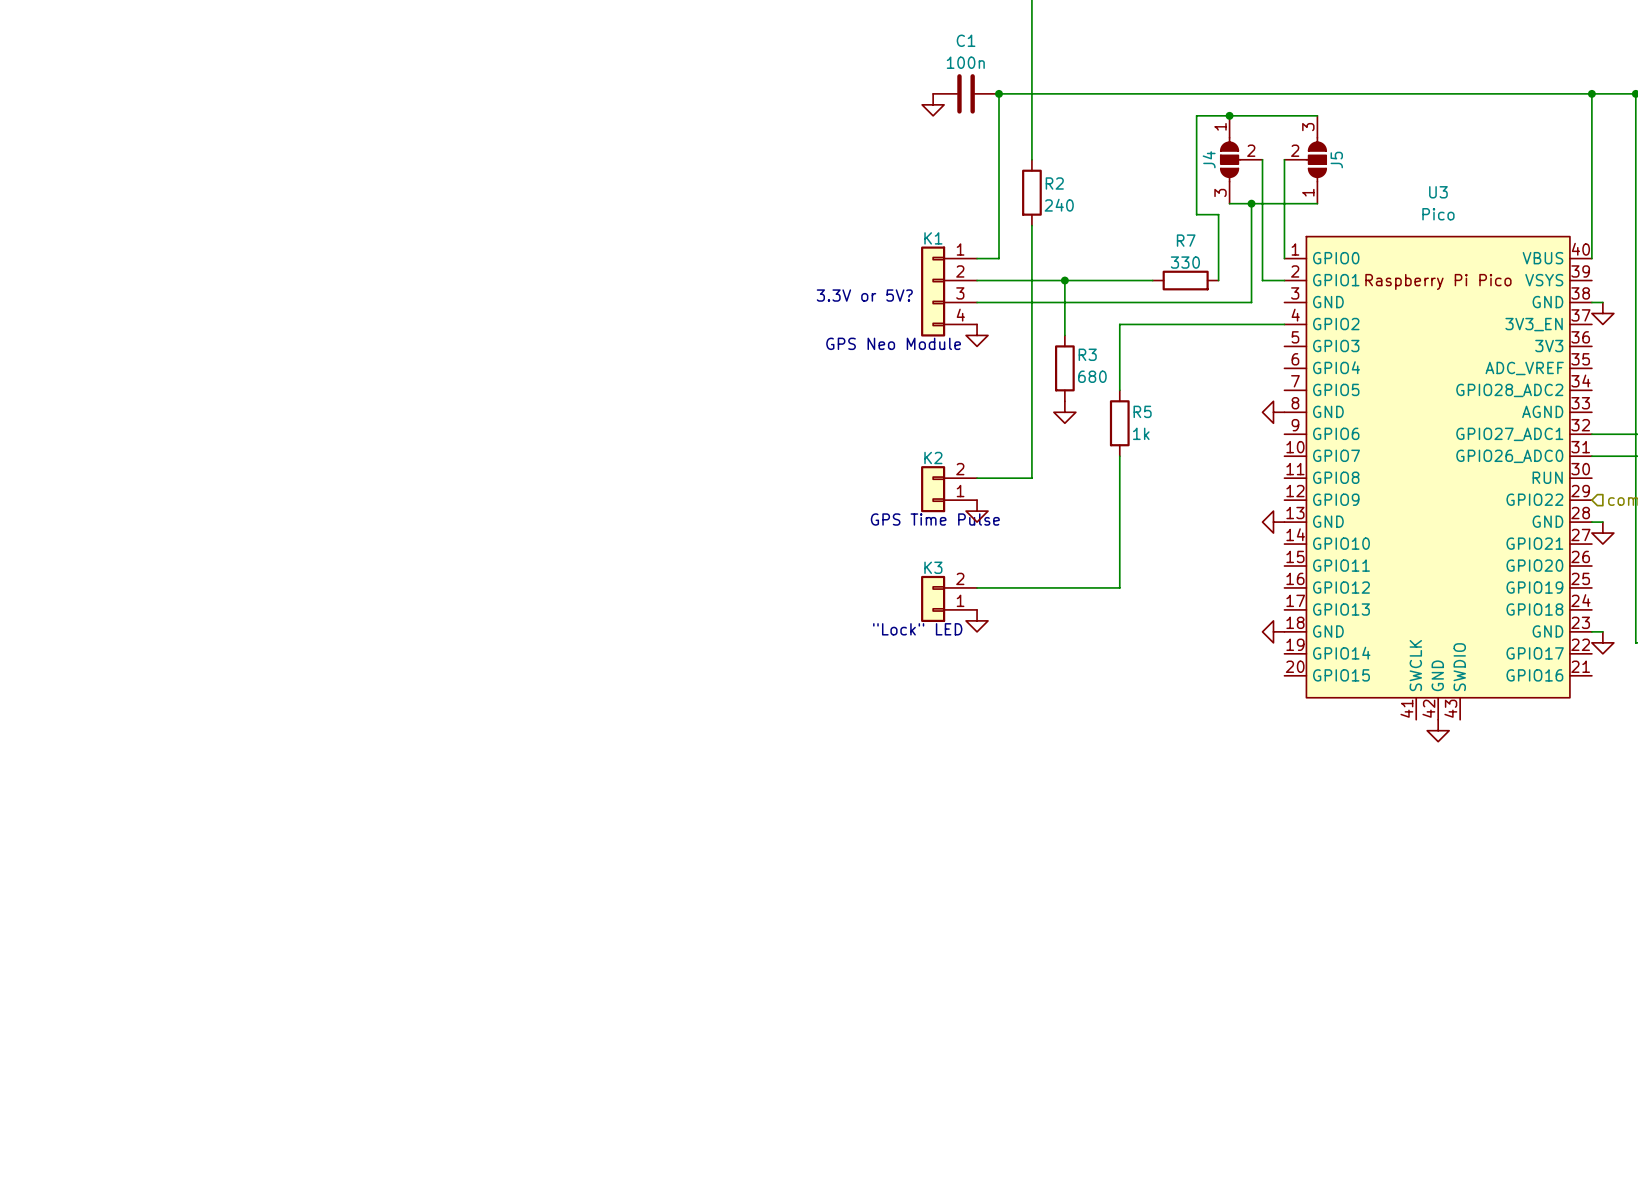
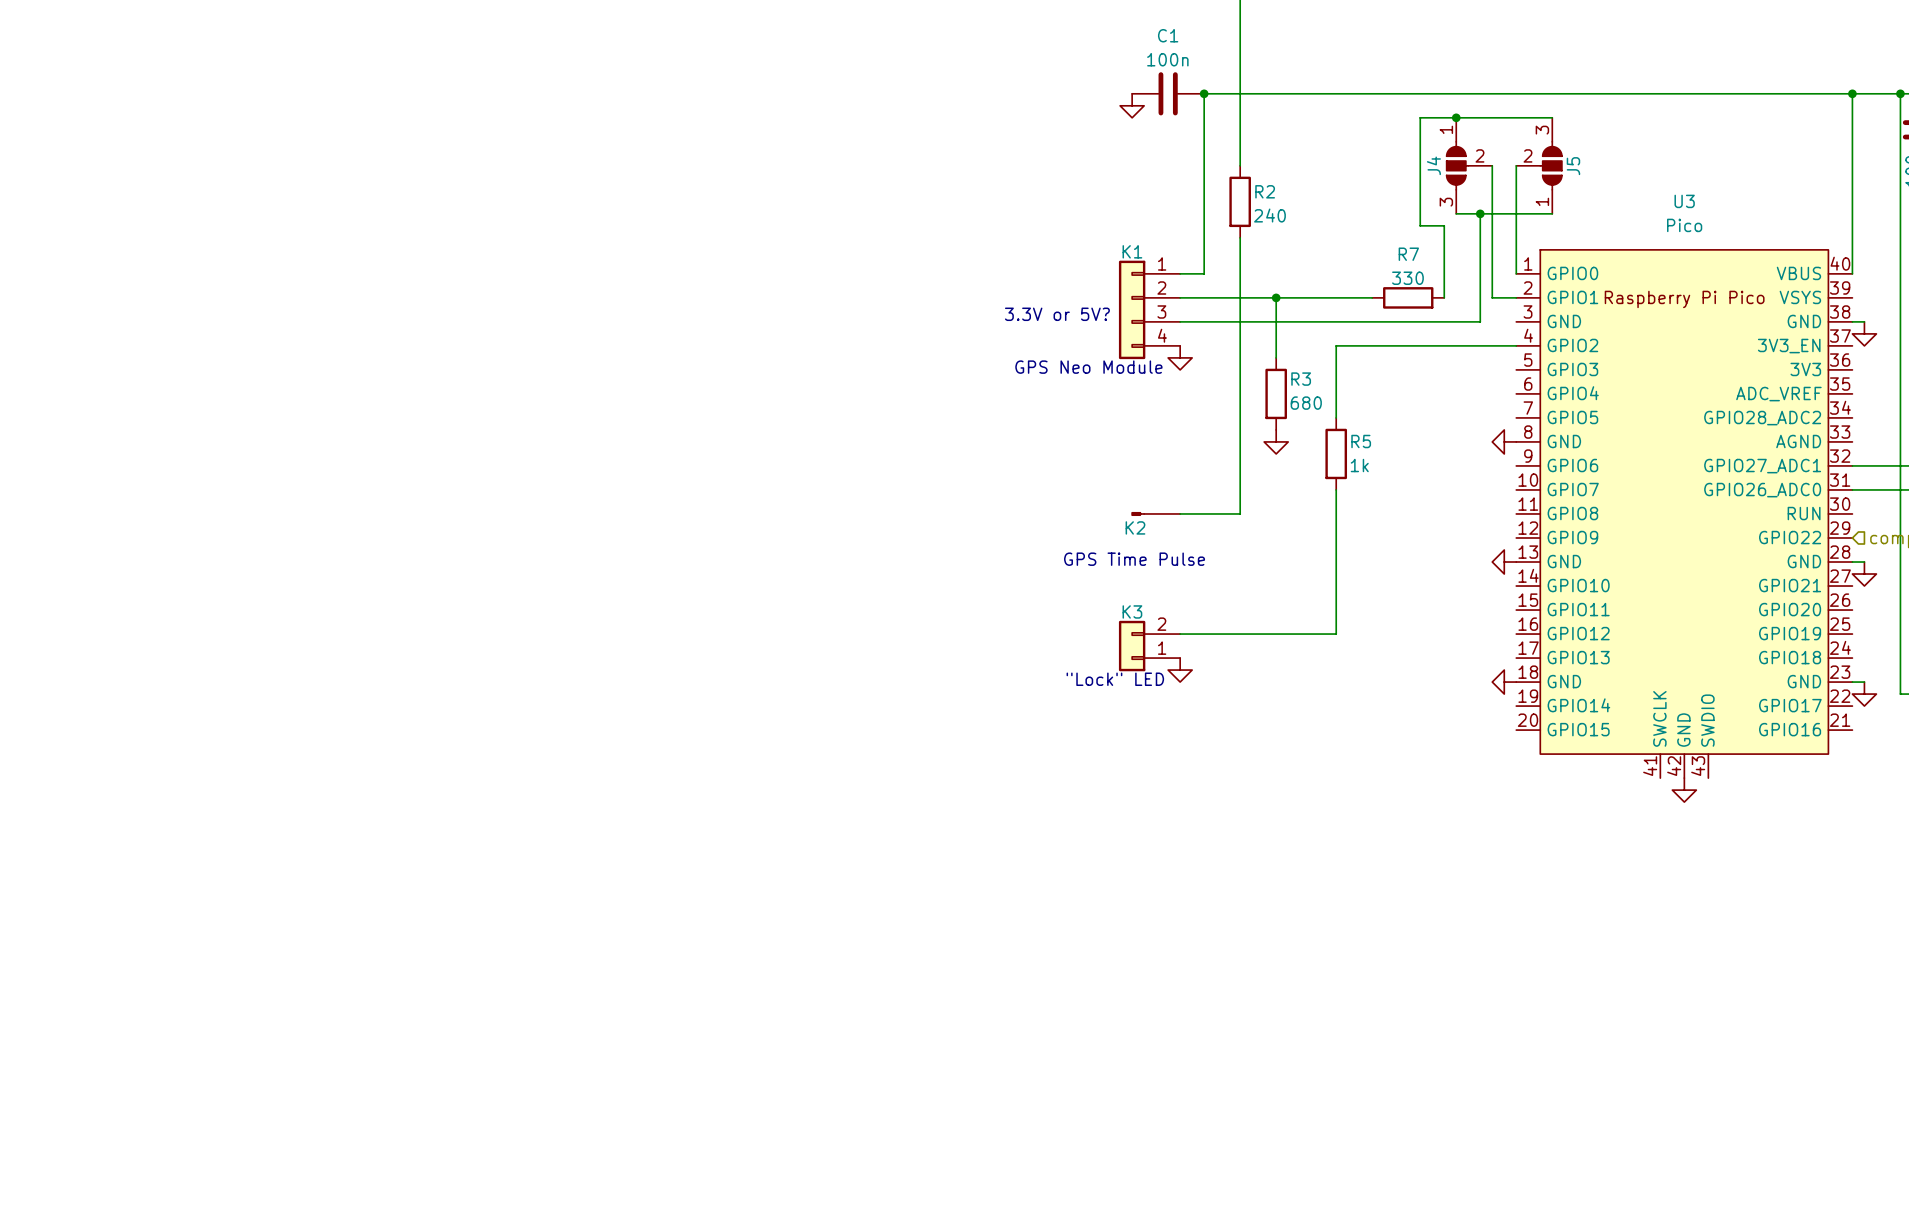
K2 name position: K2 (933, 457) -> K2 (1135, 527)
K2 symbol: [921, 466, 978, 513] -> [1131, 512, 1181, 516]
power symbol: (977, 511) -> none

